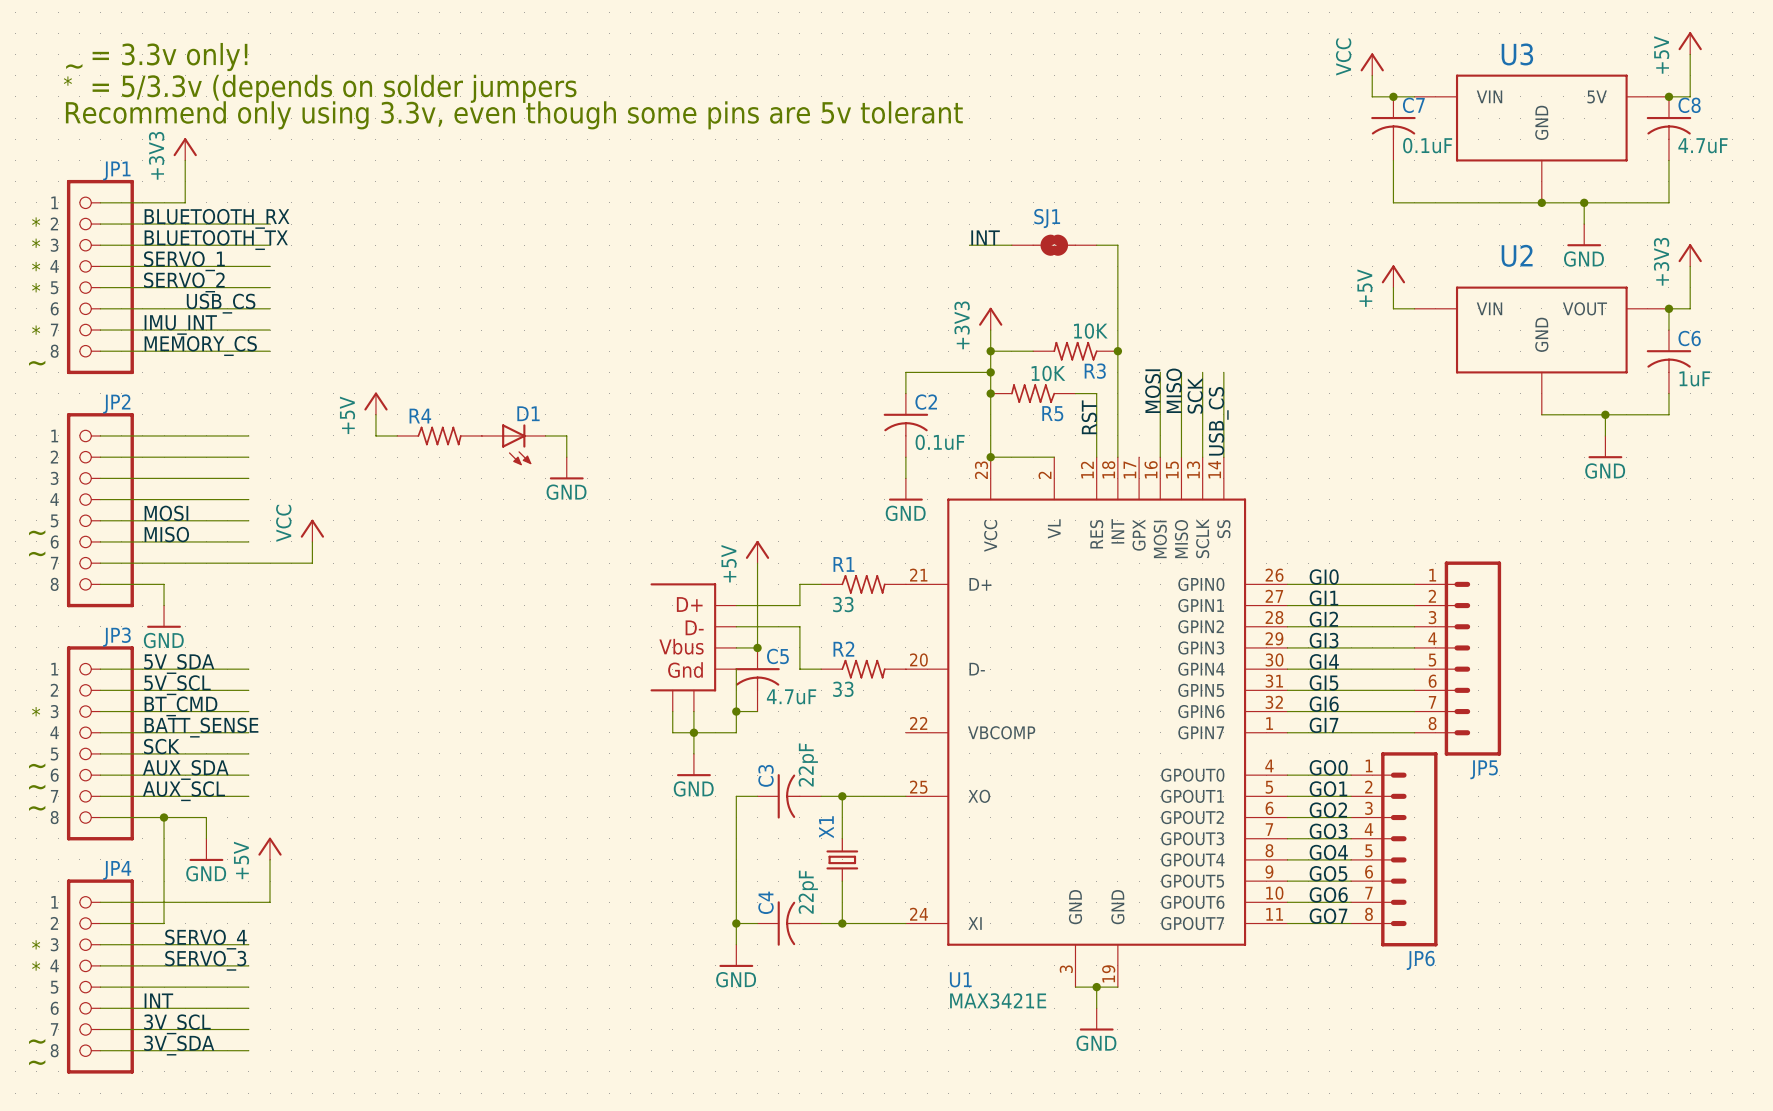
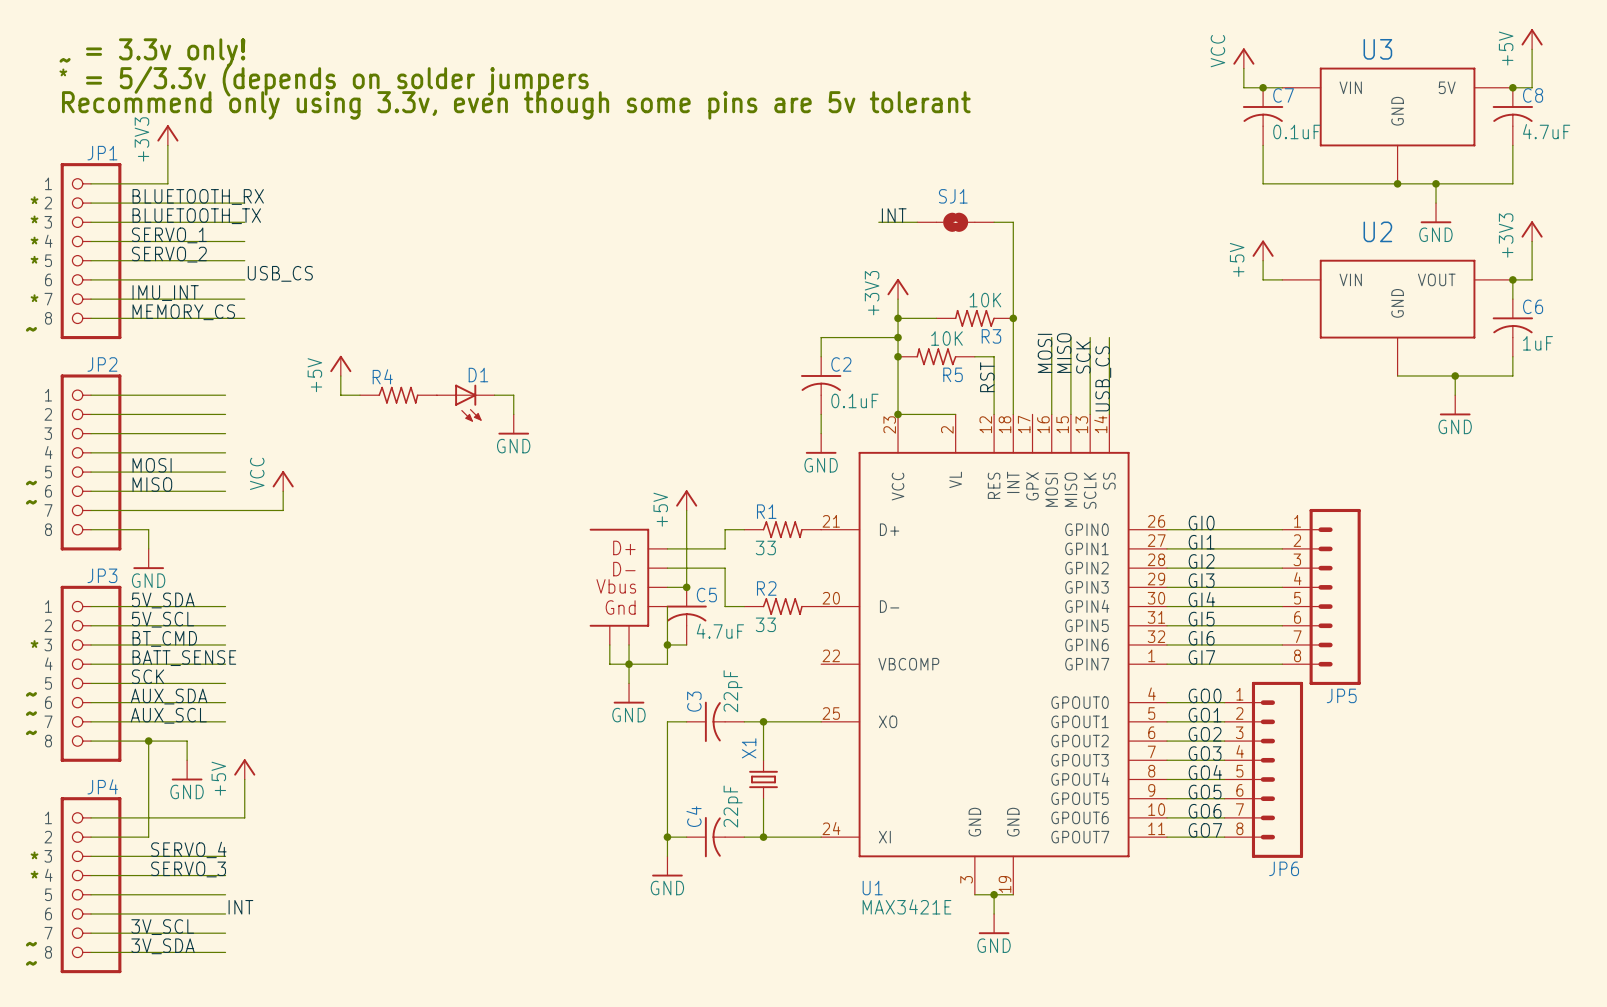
label position: USB_CS (221, 303) -> USB_CS (280, 273)
label position: INT (158, 1000) -> INT (240, 907)

